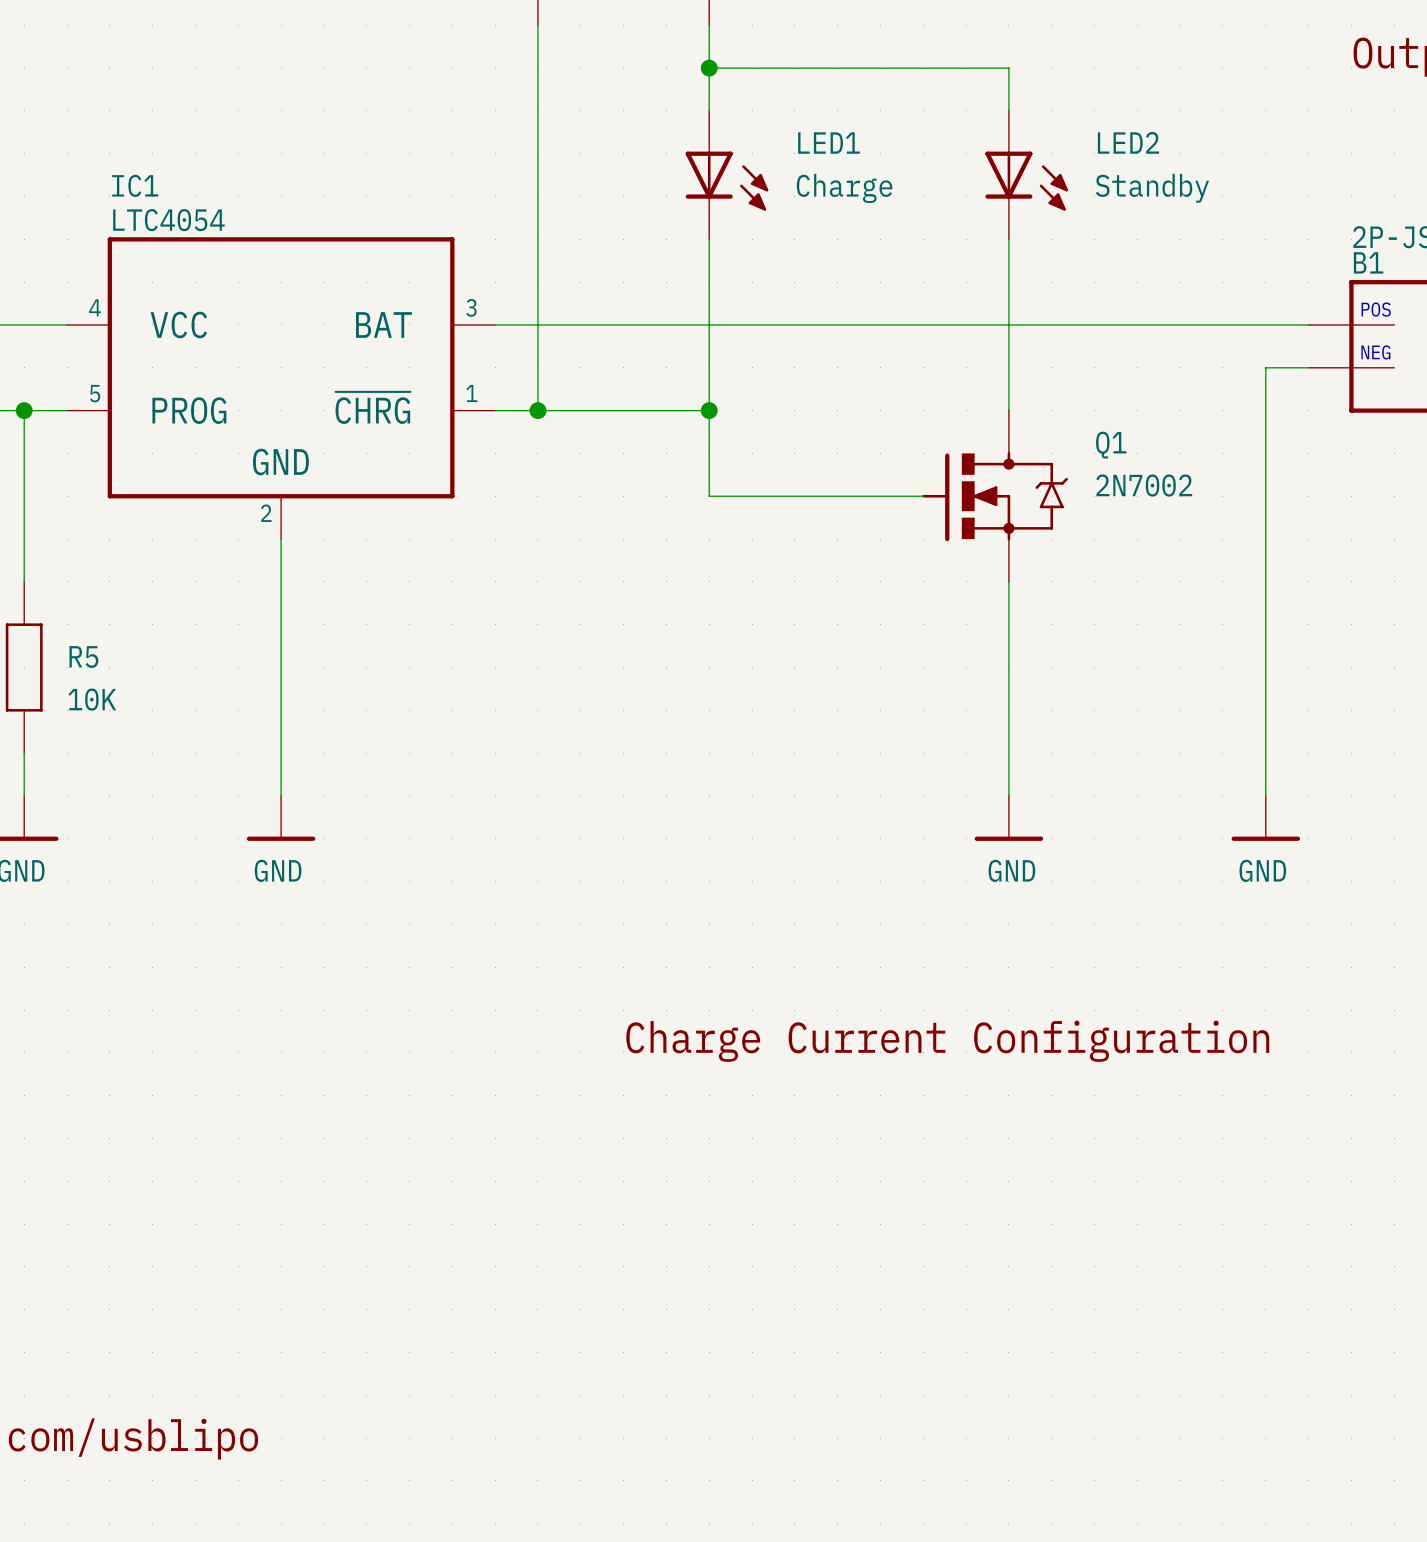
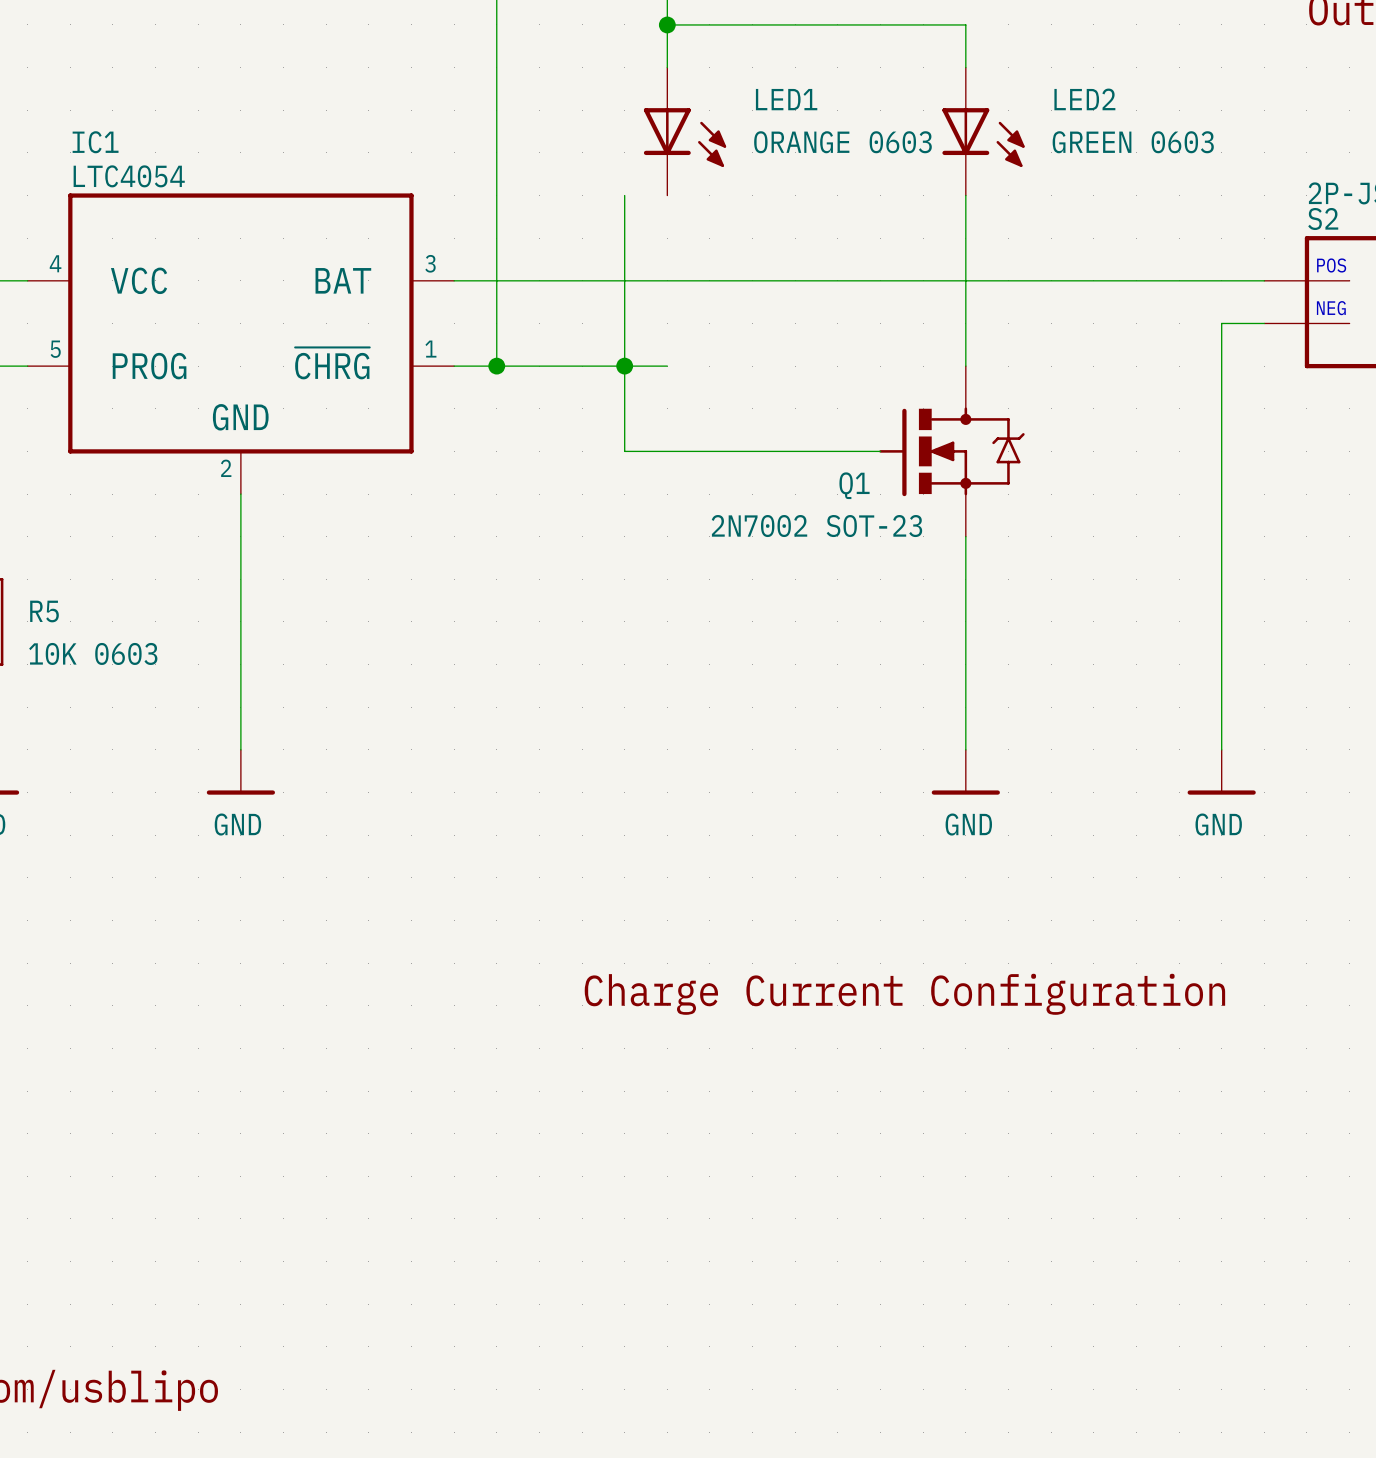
LED1 value: Charge (844, 188) -> ORANGE 0603 (842, 142)
LED2 value: Standby (1152, 188) -> GREEN 0603 (1133, 142)
wire: (709, 239) (709, 496) -> (624, 195) (624, 451) (667, 451)
B1 name: B1 (1368, 262) -> S2 (1323, 219)
junction position: (709, 410) -> (624, 366)
Q1 name position: Q1 (1111, 445) -> Q1 (854, 485)
Q1 value: 2N7002 (1144, 485) -> 2N7002 SOT-23 (816, 526)
R5 value: 10K (92, 699) -> 10K 0603 (93, 653)

